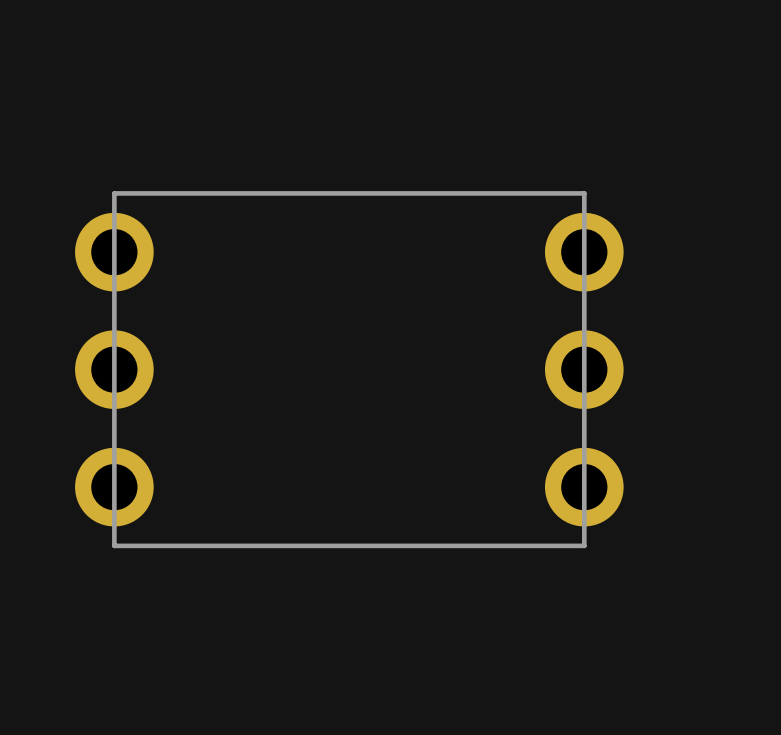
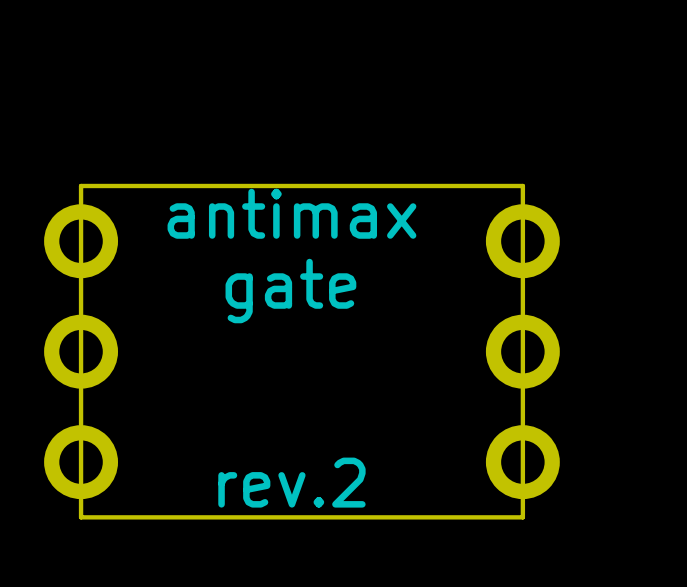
text: none -> antimax (291, 213)
text: none -> gate (290, 291)
text: none -> rev.2 (291, 482)

